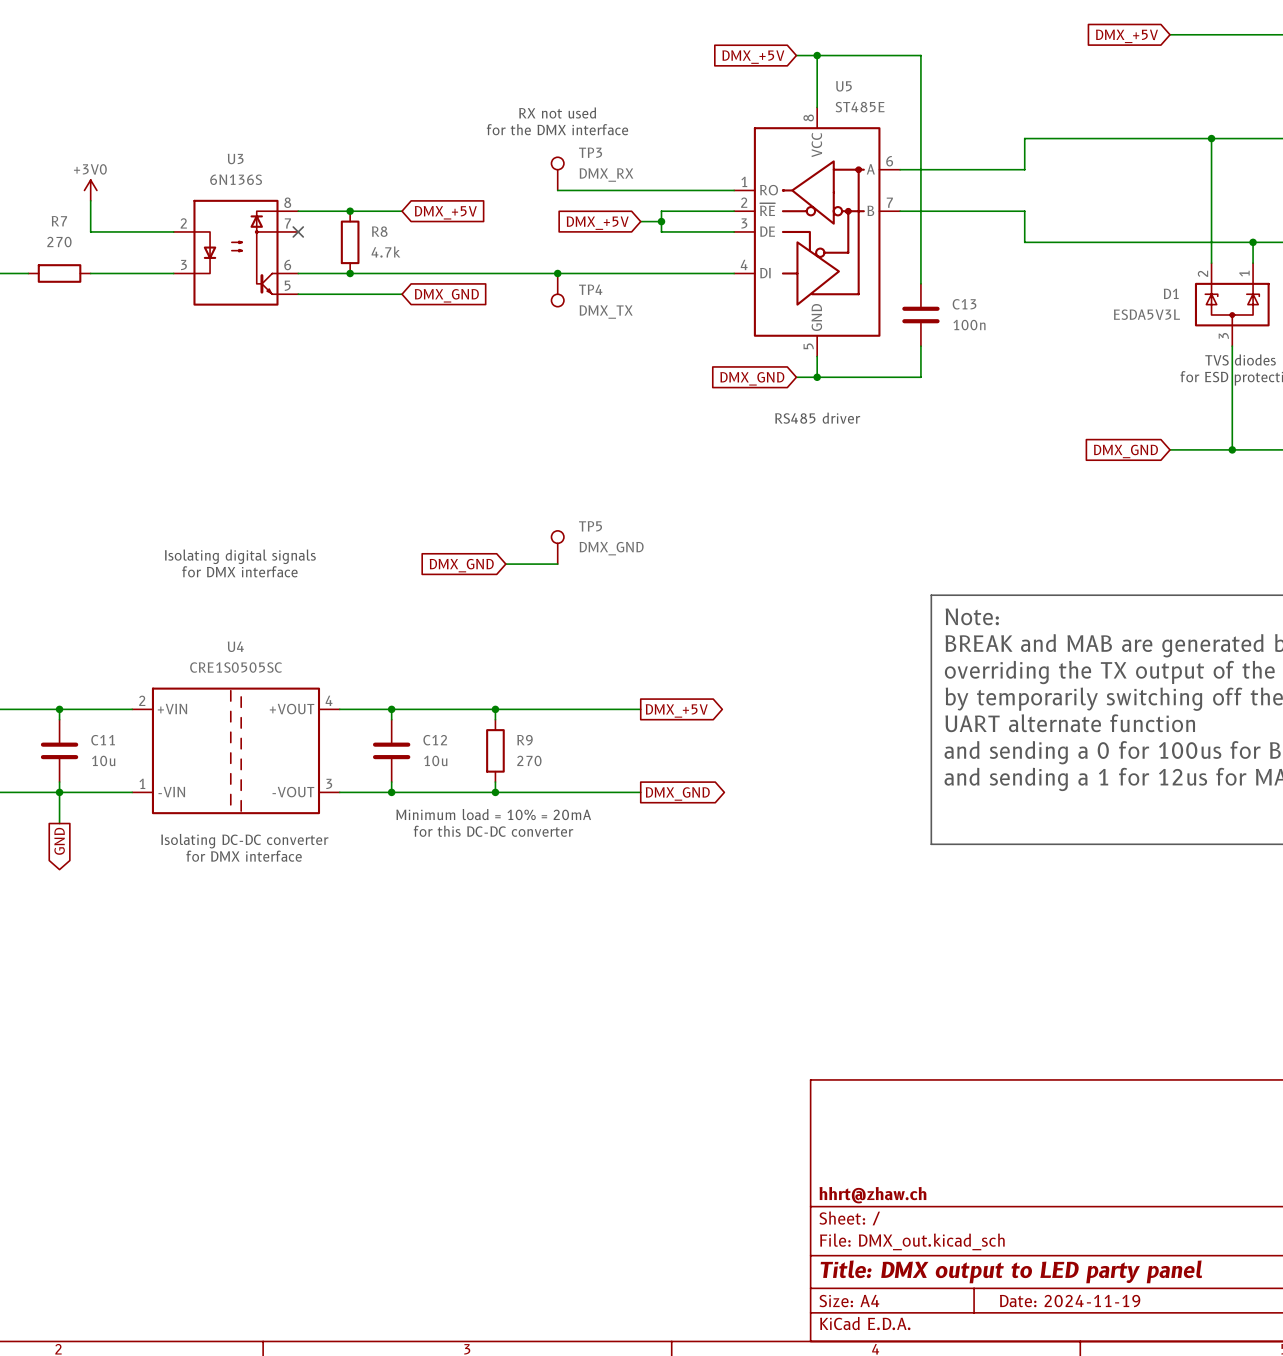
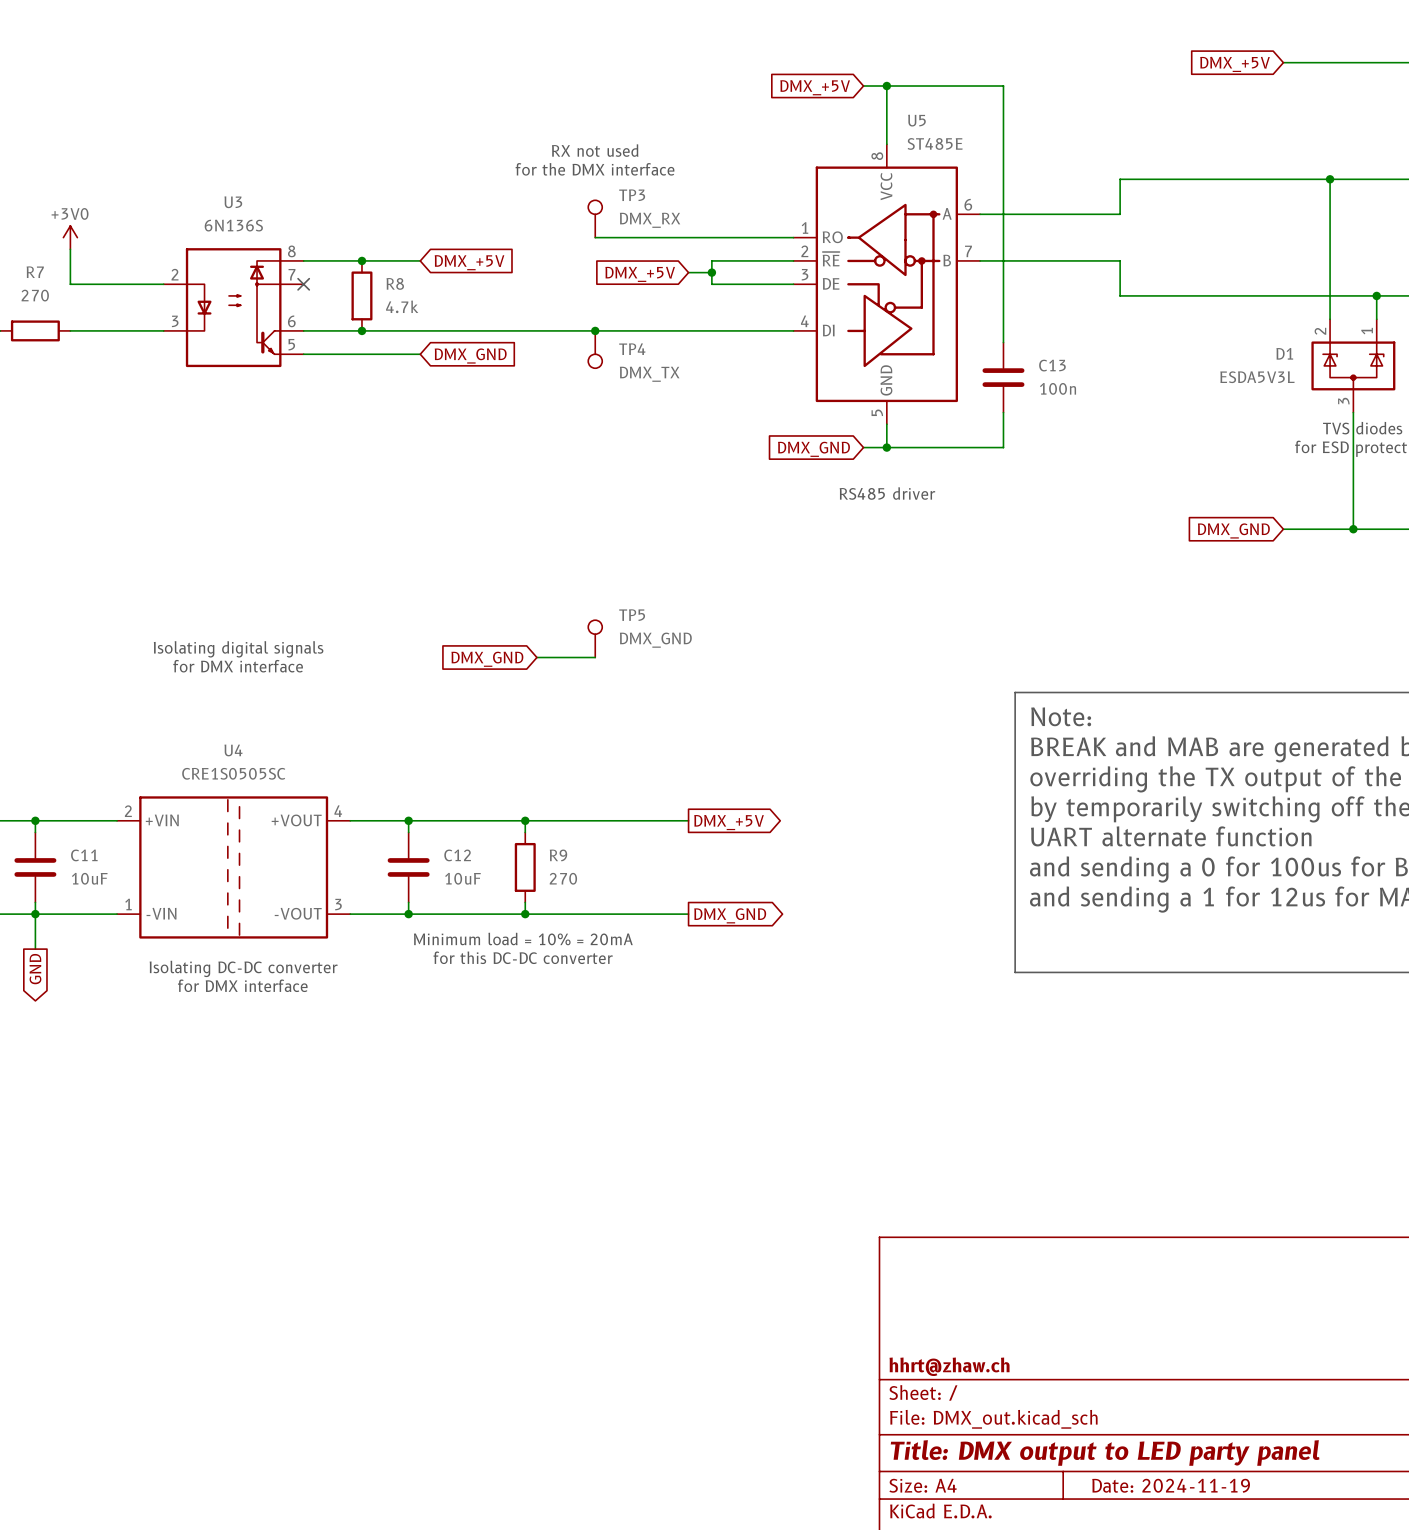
C11 value: 10u (103, 760) -> 10uF (89, 878)
C12 value: 10u (435, 760) -> 10uF (462, 878)

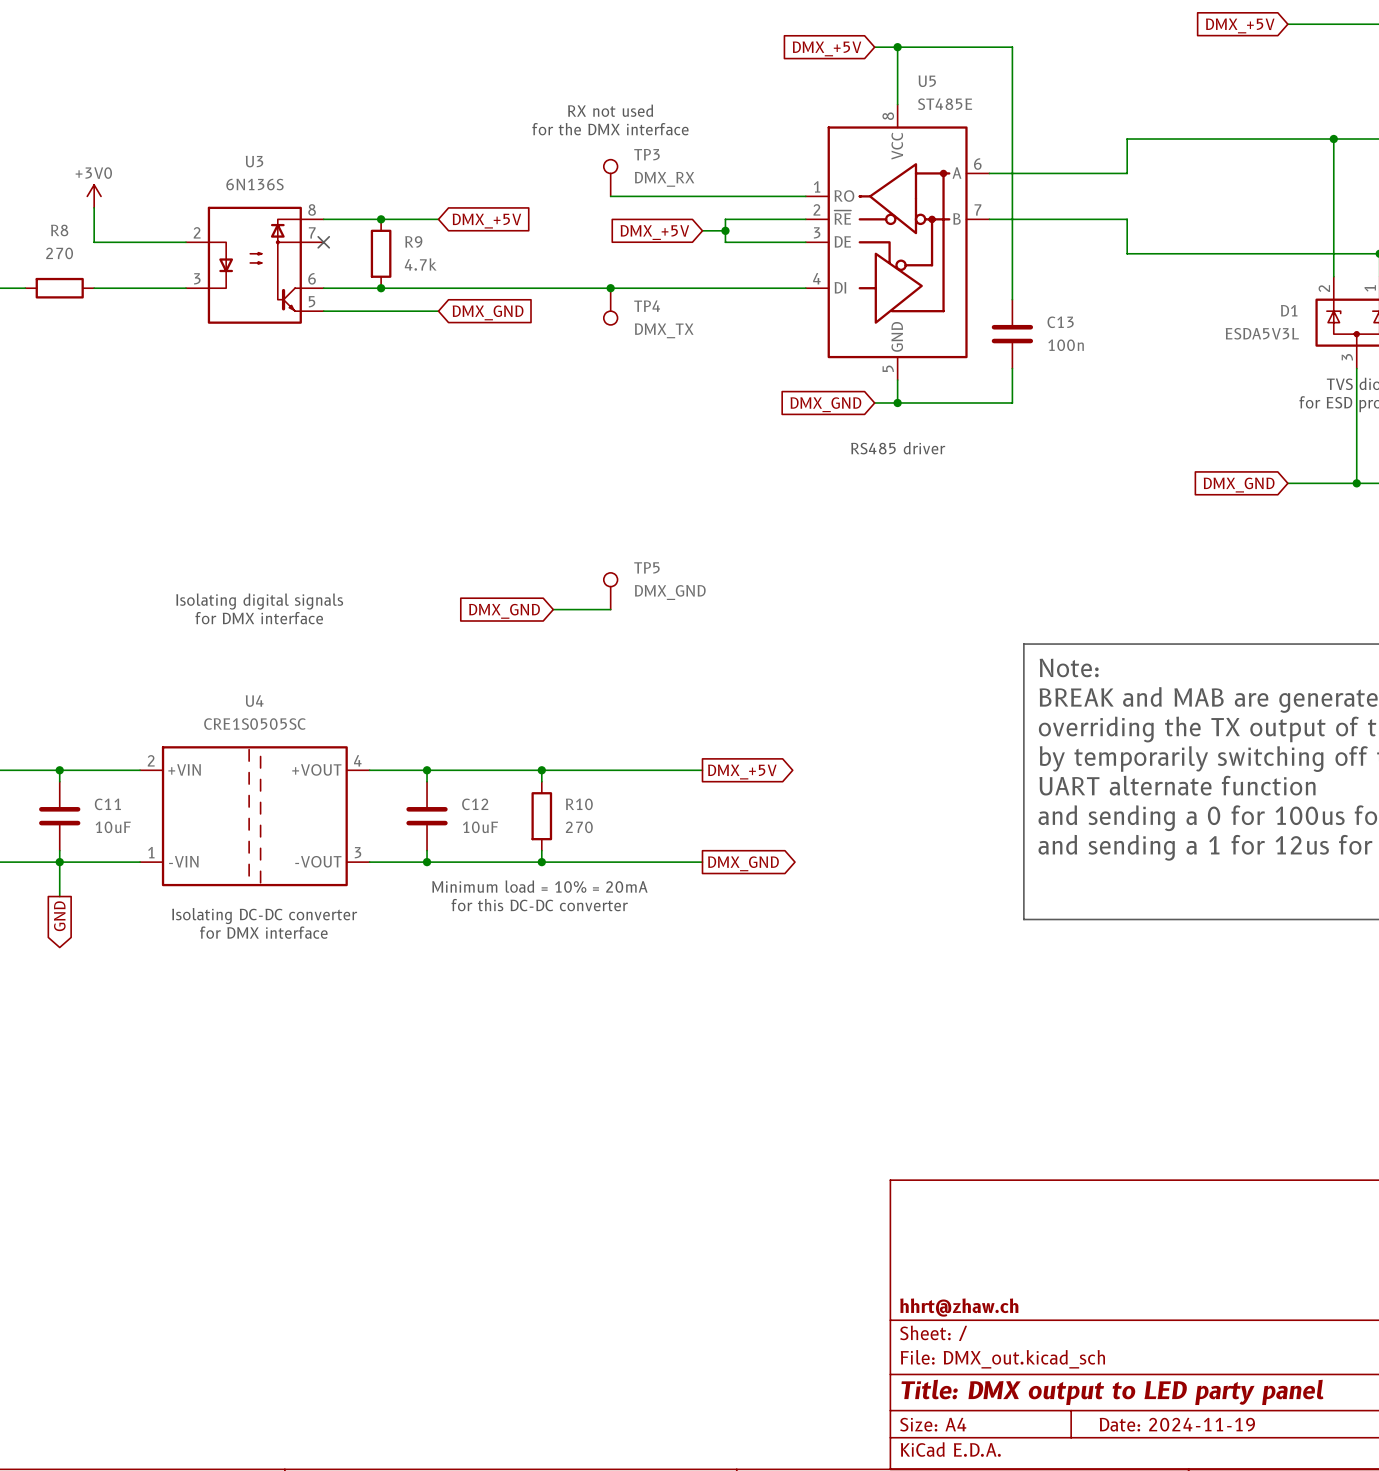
R7 name: R7 (35, 272) -> R8 (59, 230)
R8 name: R8 (395, 283) -> R9 (413, 241)
R9 name: R9 (558, 855) -> R10 (579, 804)

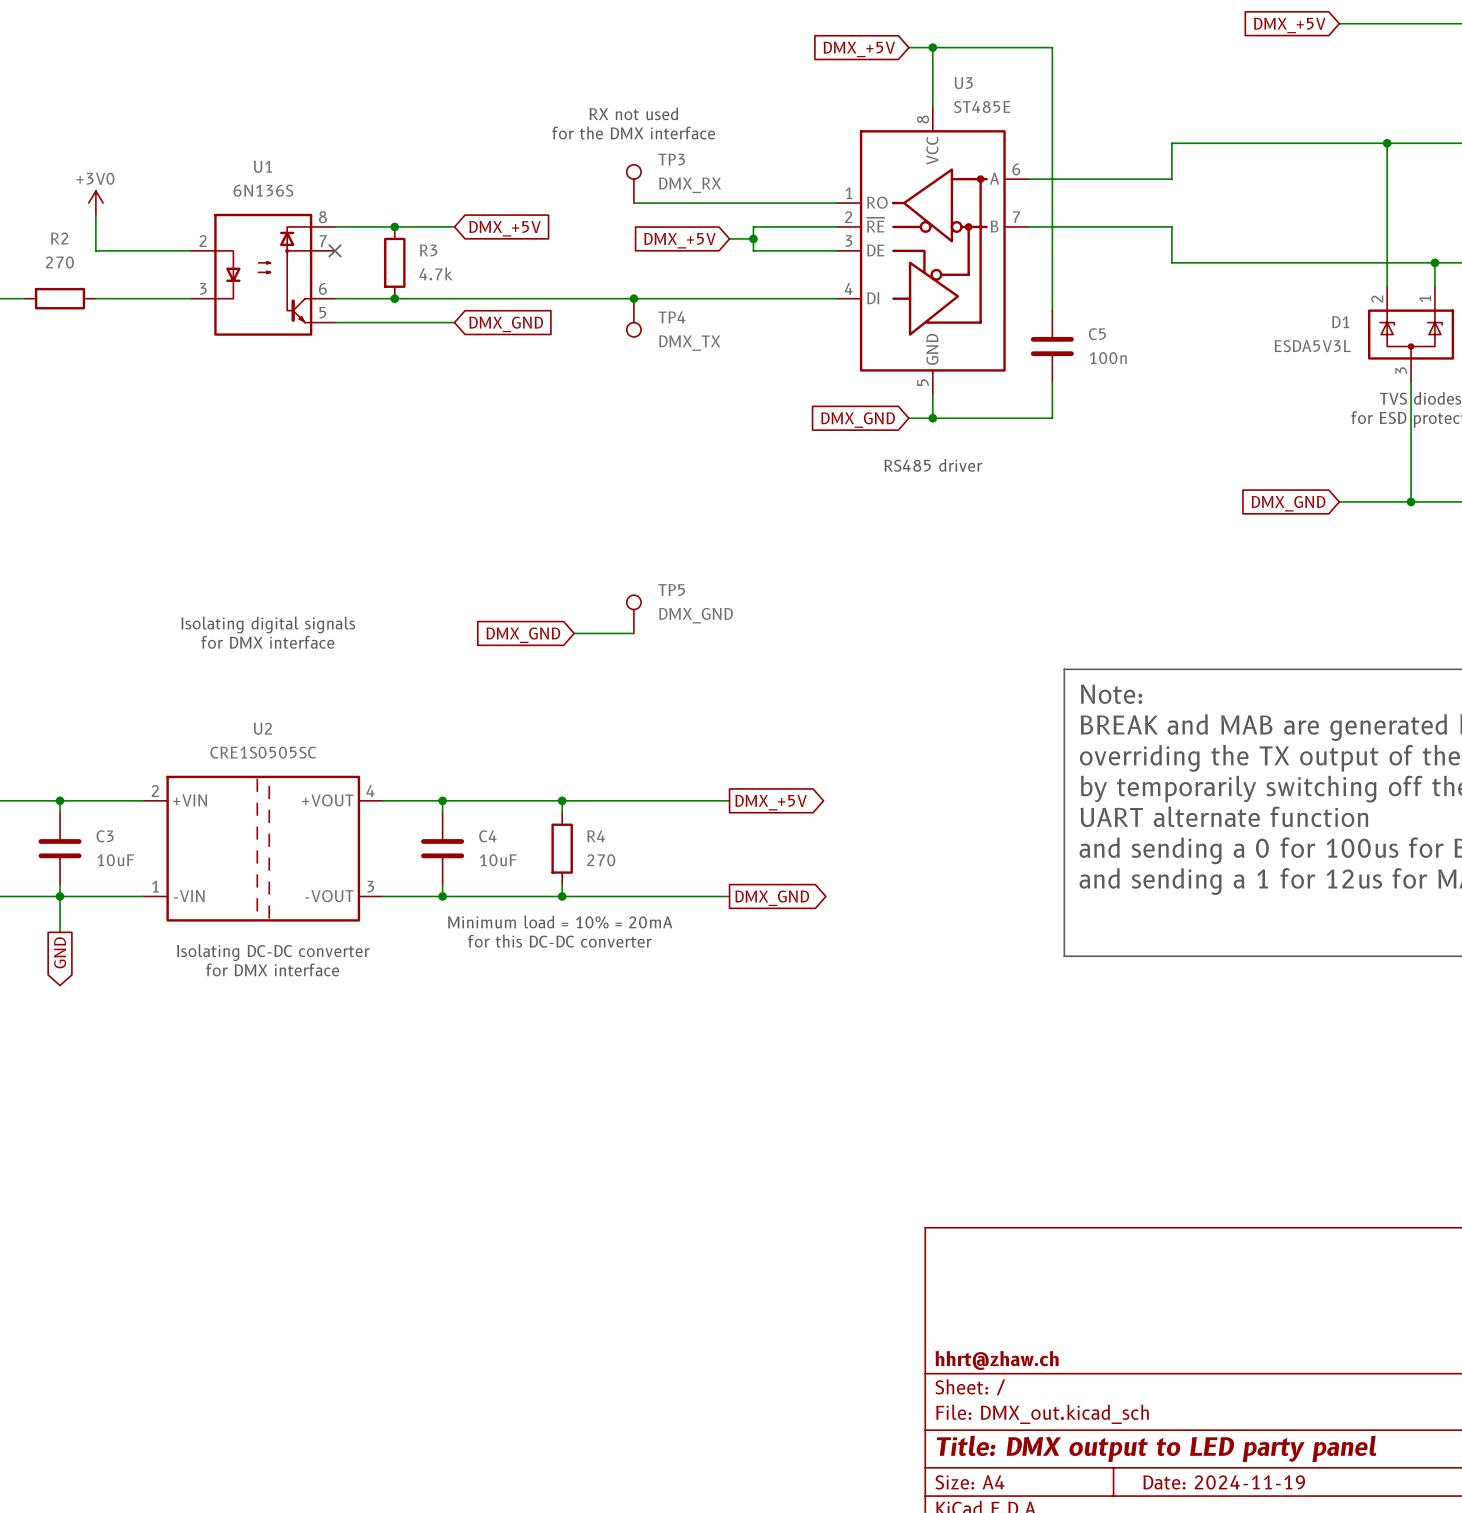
U5 name: U5 (927, 81) -> U3 (963, 83)
U3 name: U3 (254, 161) -> U1 (262, 166)
R8 name: R8 (59, 230) -> R2 (59, 238)
R9 name: R9 (413, 241) -> R3 (428, 250)
C13 name: C13 (1060, 322) -> C5 (1097, 334)
U4 name: U4 (254, 701) -> U2 (262, 728)
C11 name: C11 (107, 804) -> C3 (105, 836)
C12 name: C12 (475, 804) -> C4 (487, 836)
R10 name: R10 (579, 804) -> R4 (596, 836)

